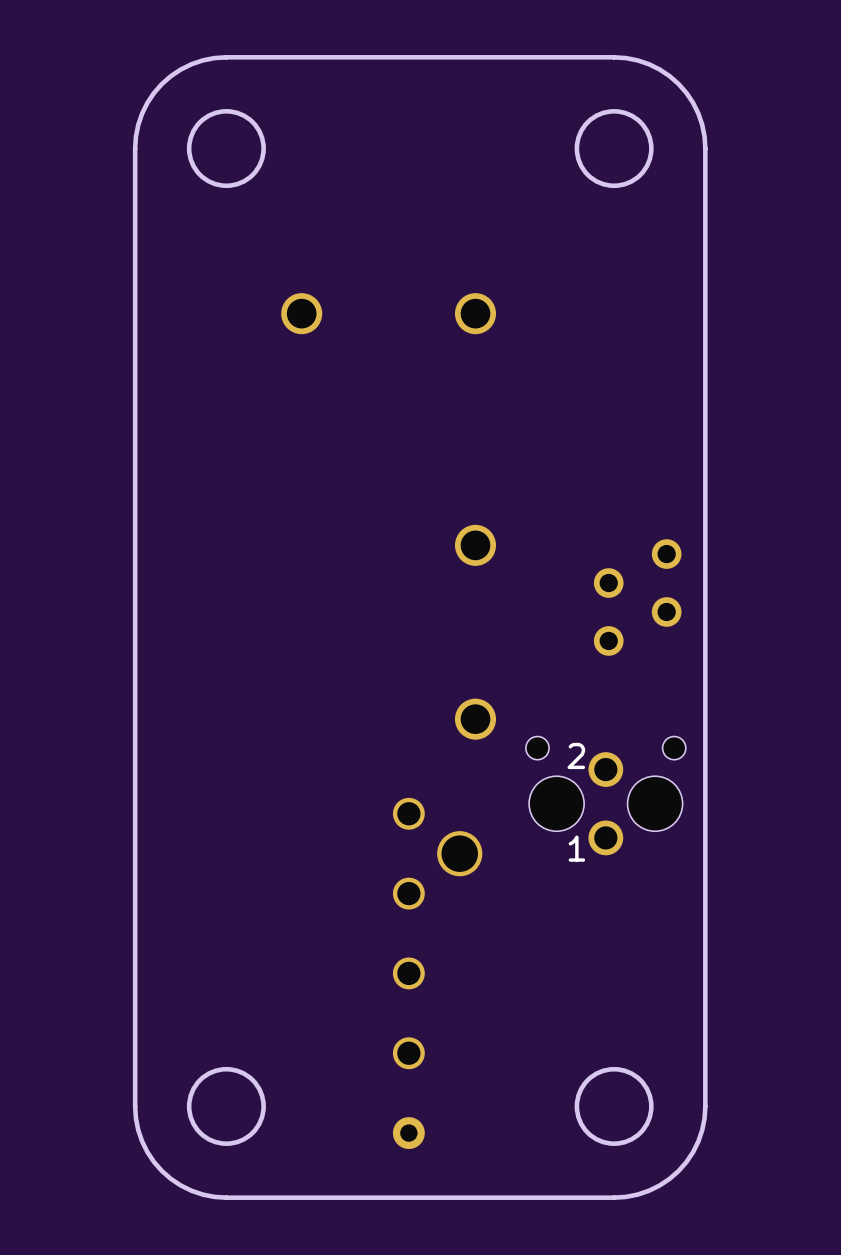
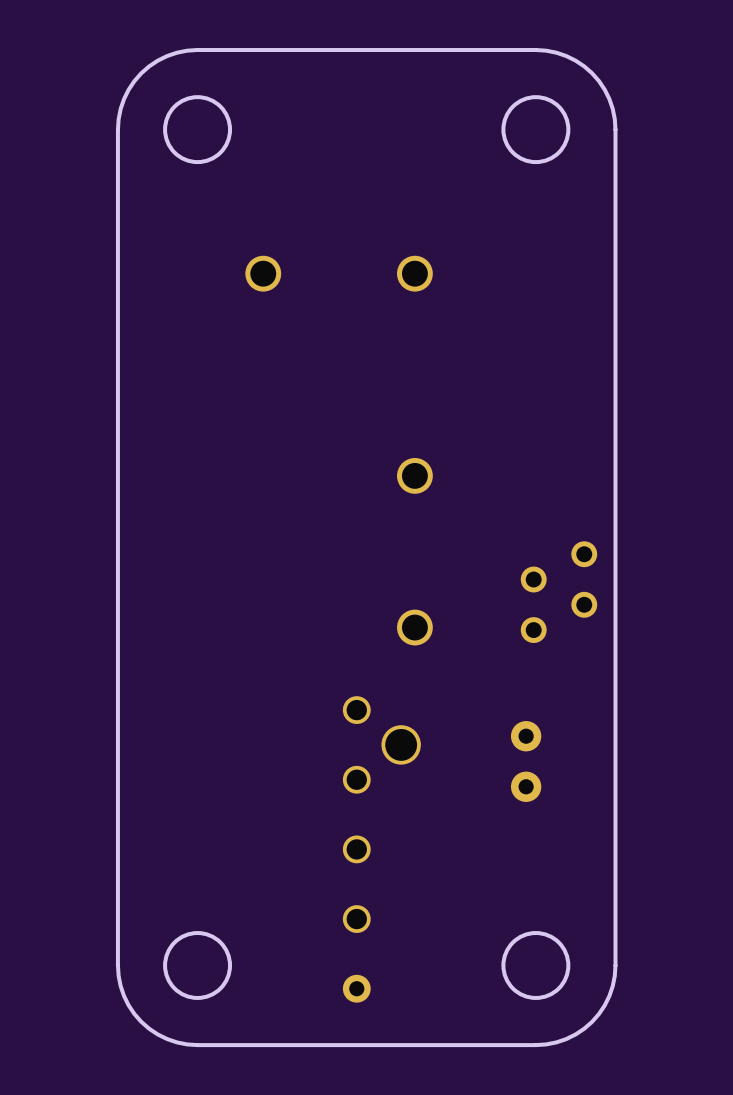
part position: (637, 597) -> (558, 592)
part: (605, 795) -> none
part: none -> (526, 761)

